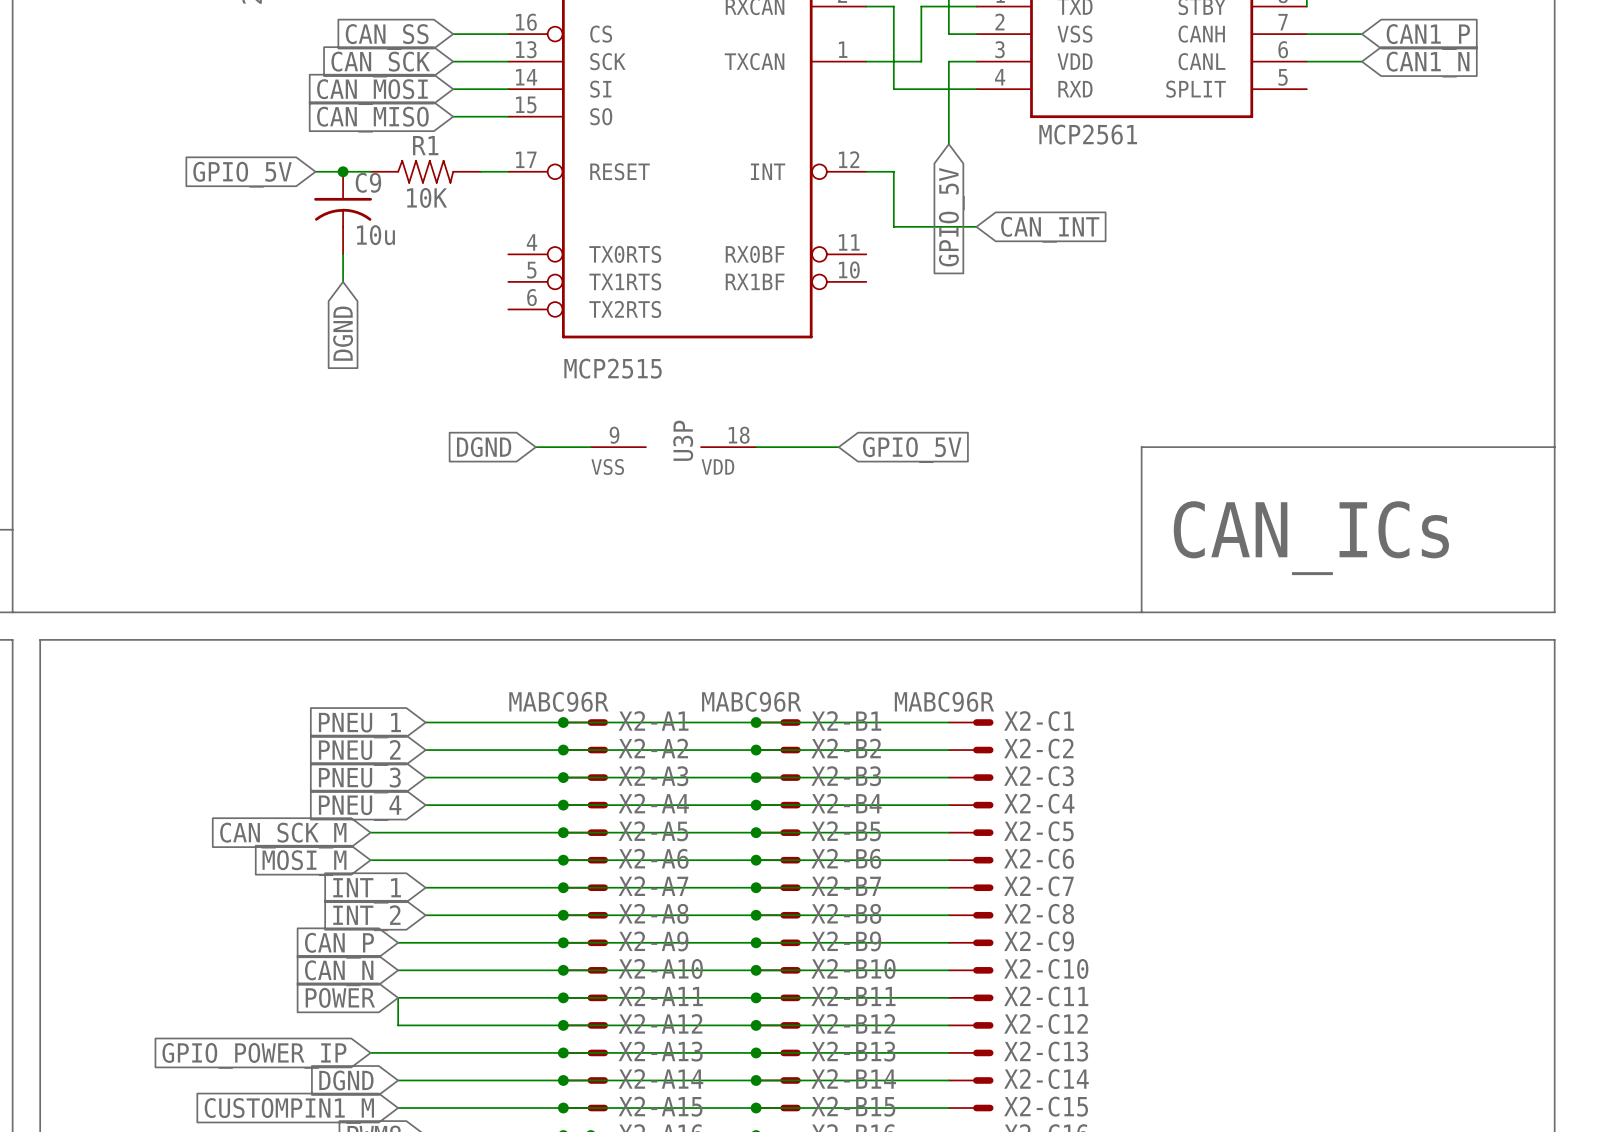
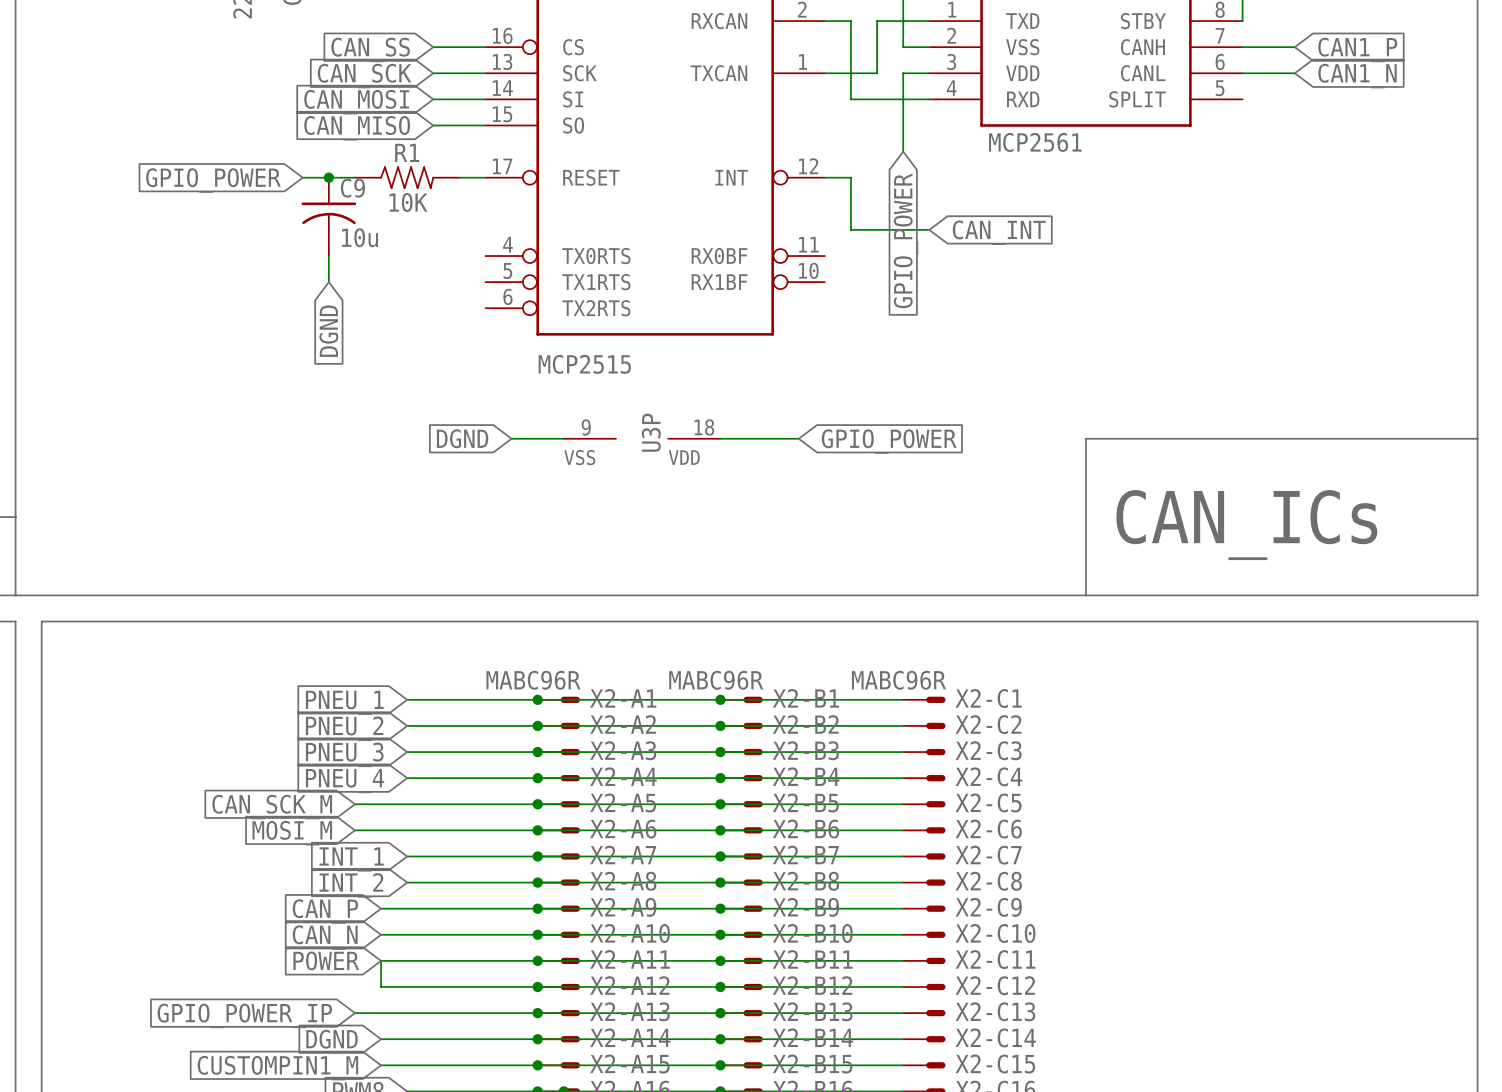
global label: GPIO_5V (242, 174) -> GPIO_POWER (213, 180)
global label: GPIO_5V (951, 217) -> GPIO_POWER (906, 240)
global label: GPIO_5V (912, 450) -> GPIO_POWER (889, 441)

